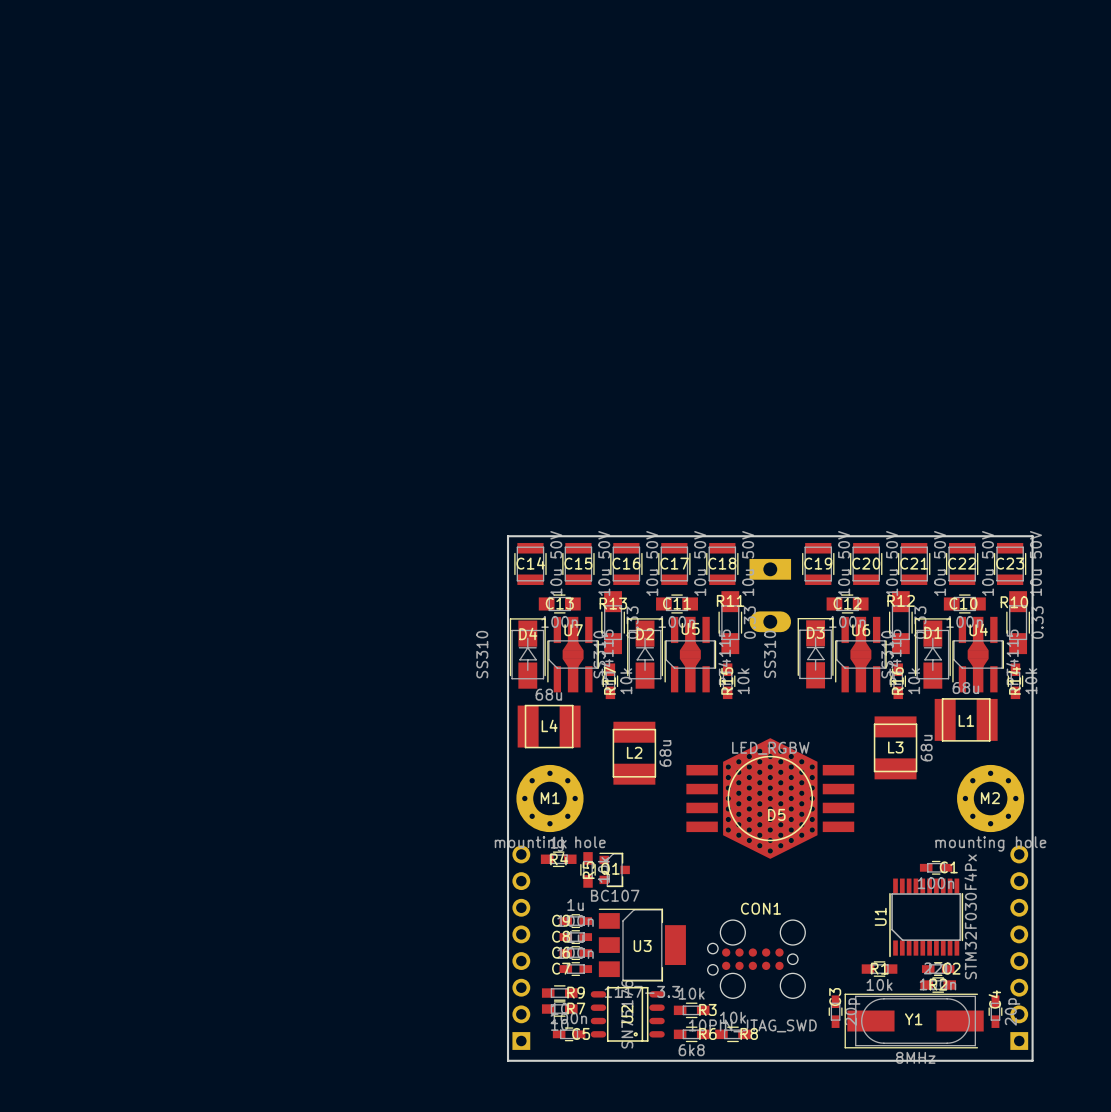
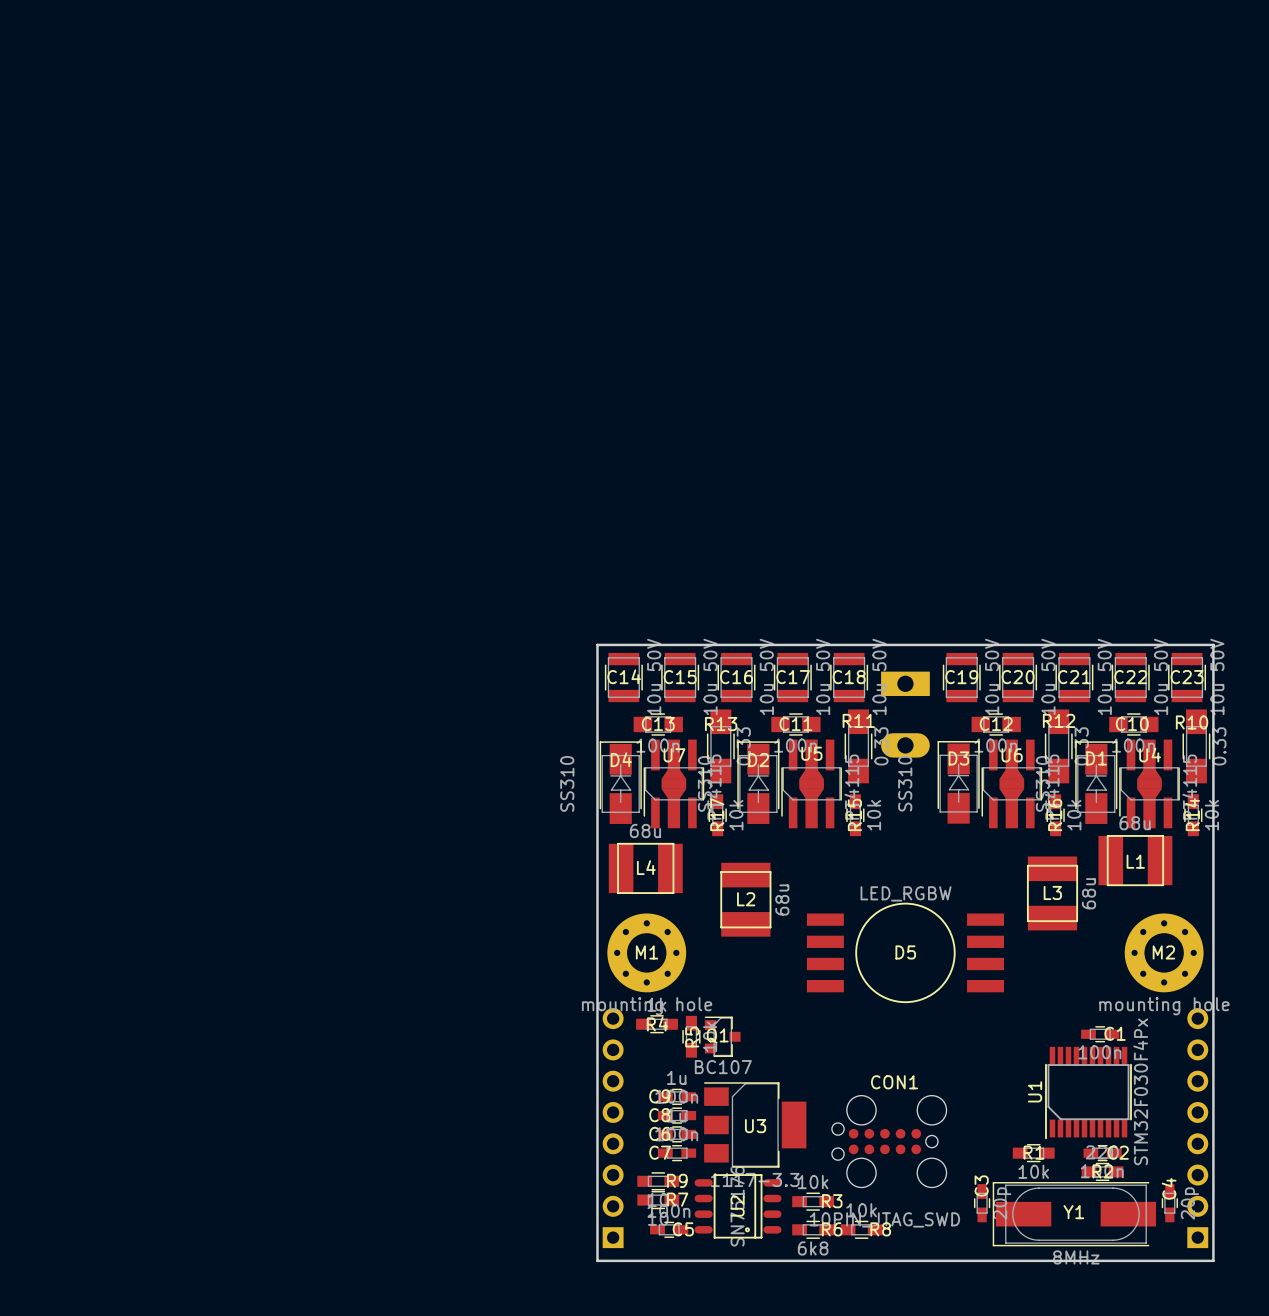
D5 footprint: [686, 738, 855, 859] -> [806, 902, 1005, 1004]

